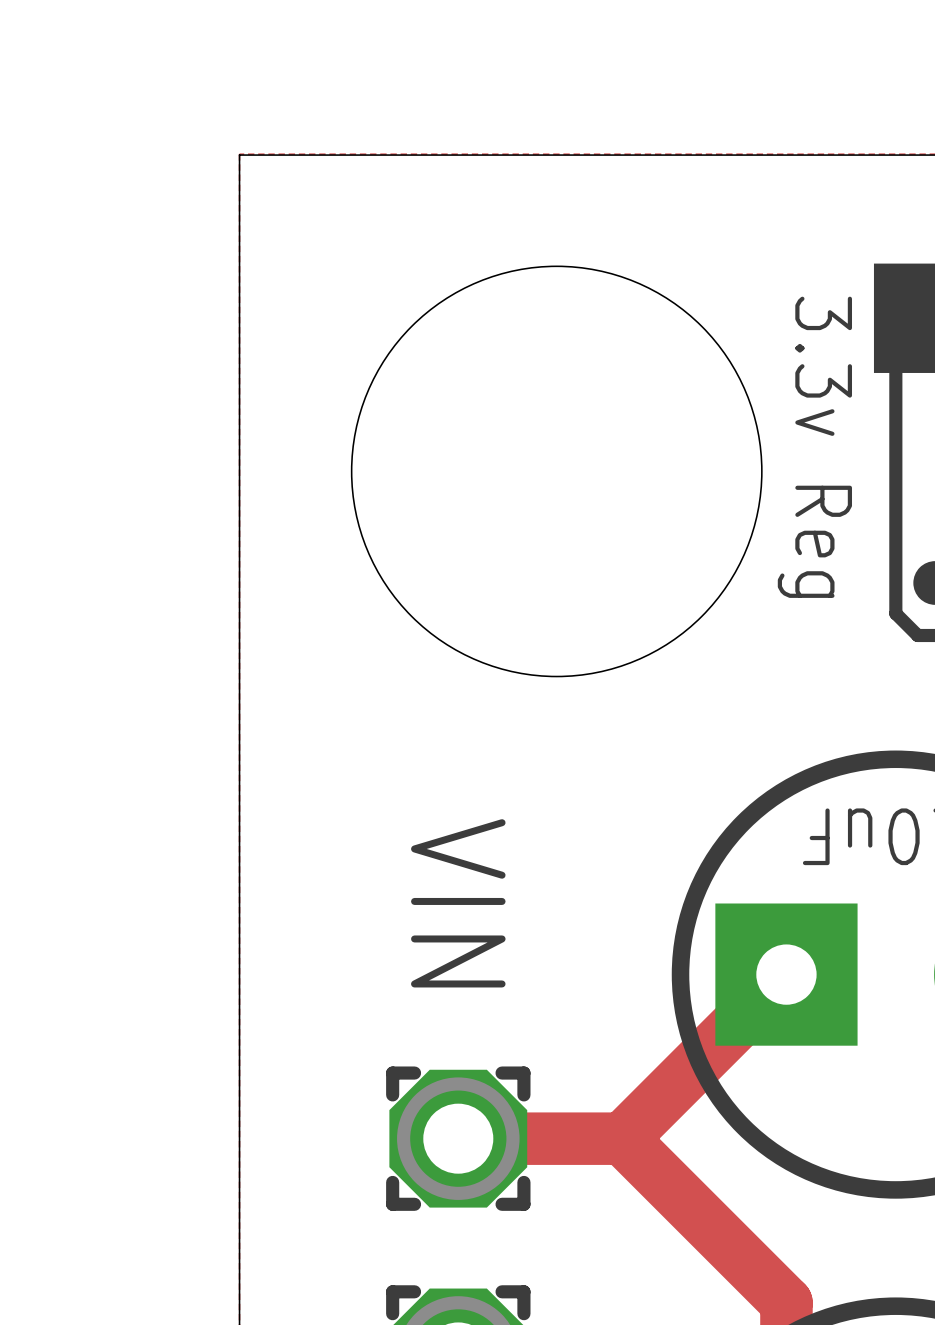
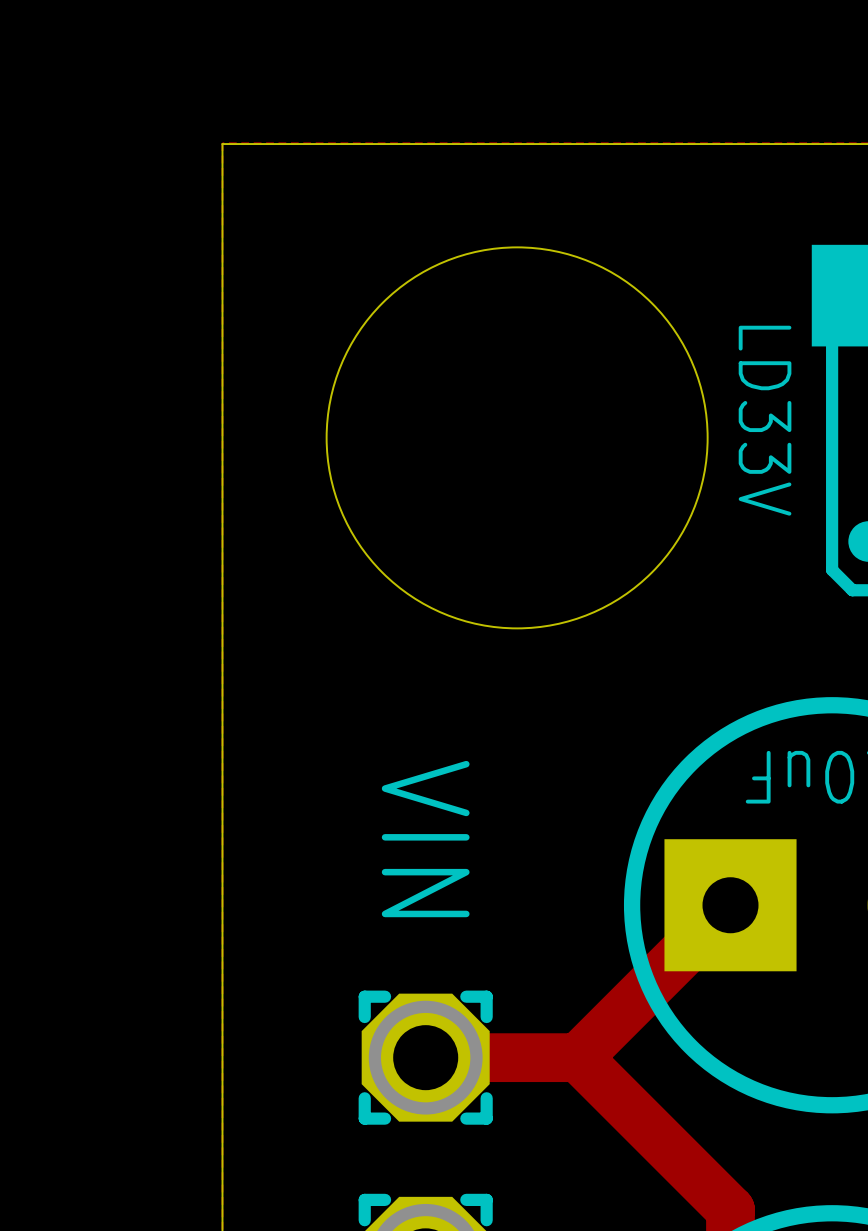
text: 3.3v Reg (814, 447) -> LD33V (765, 420)

